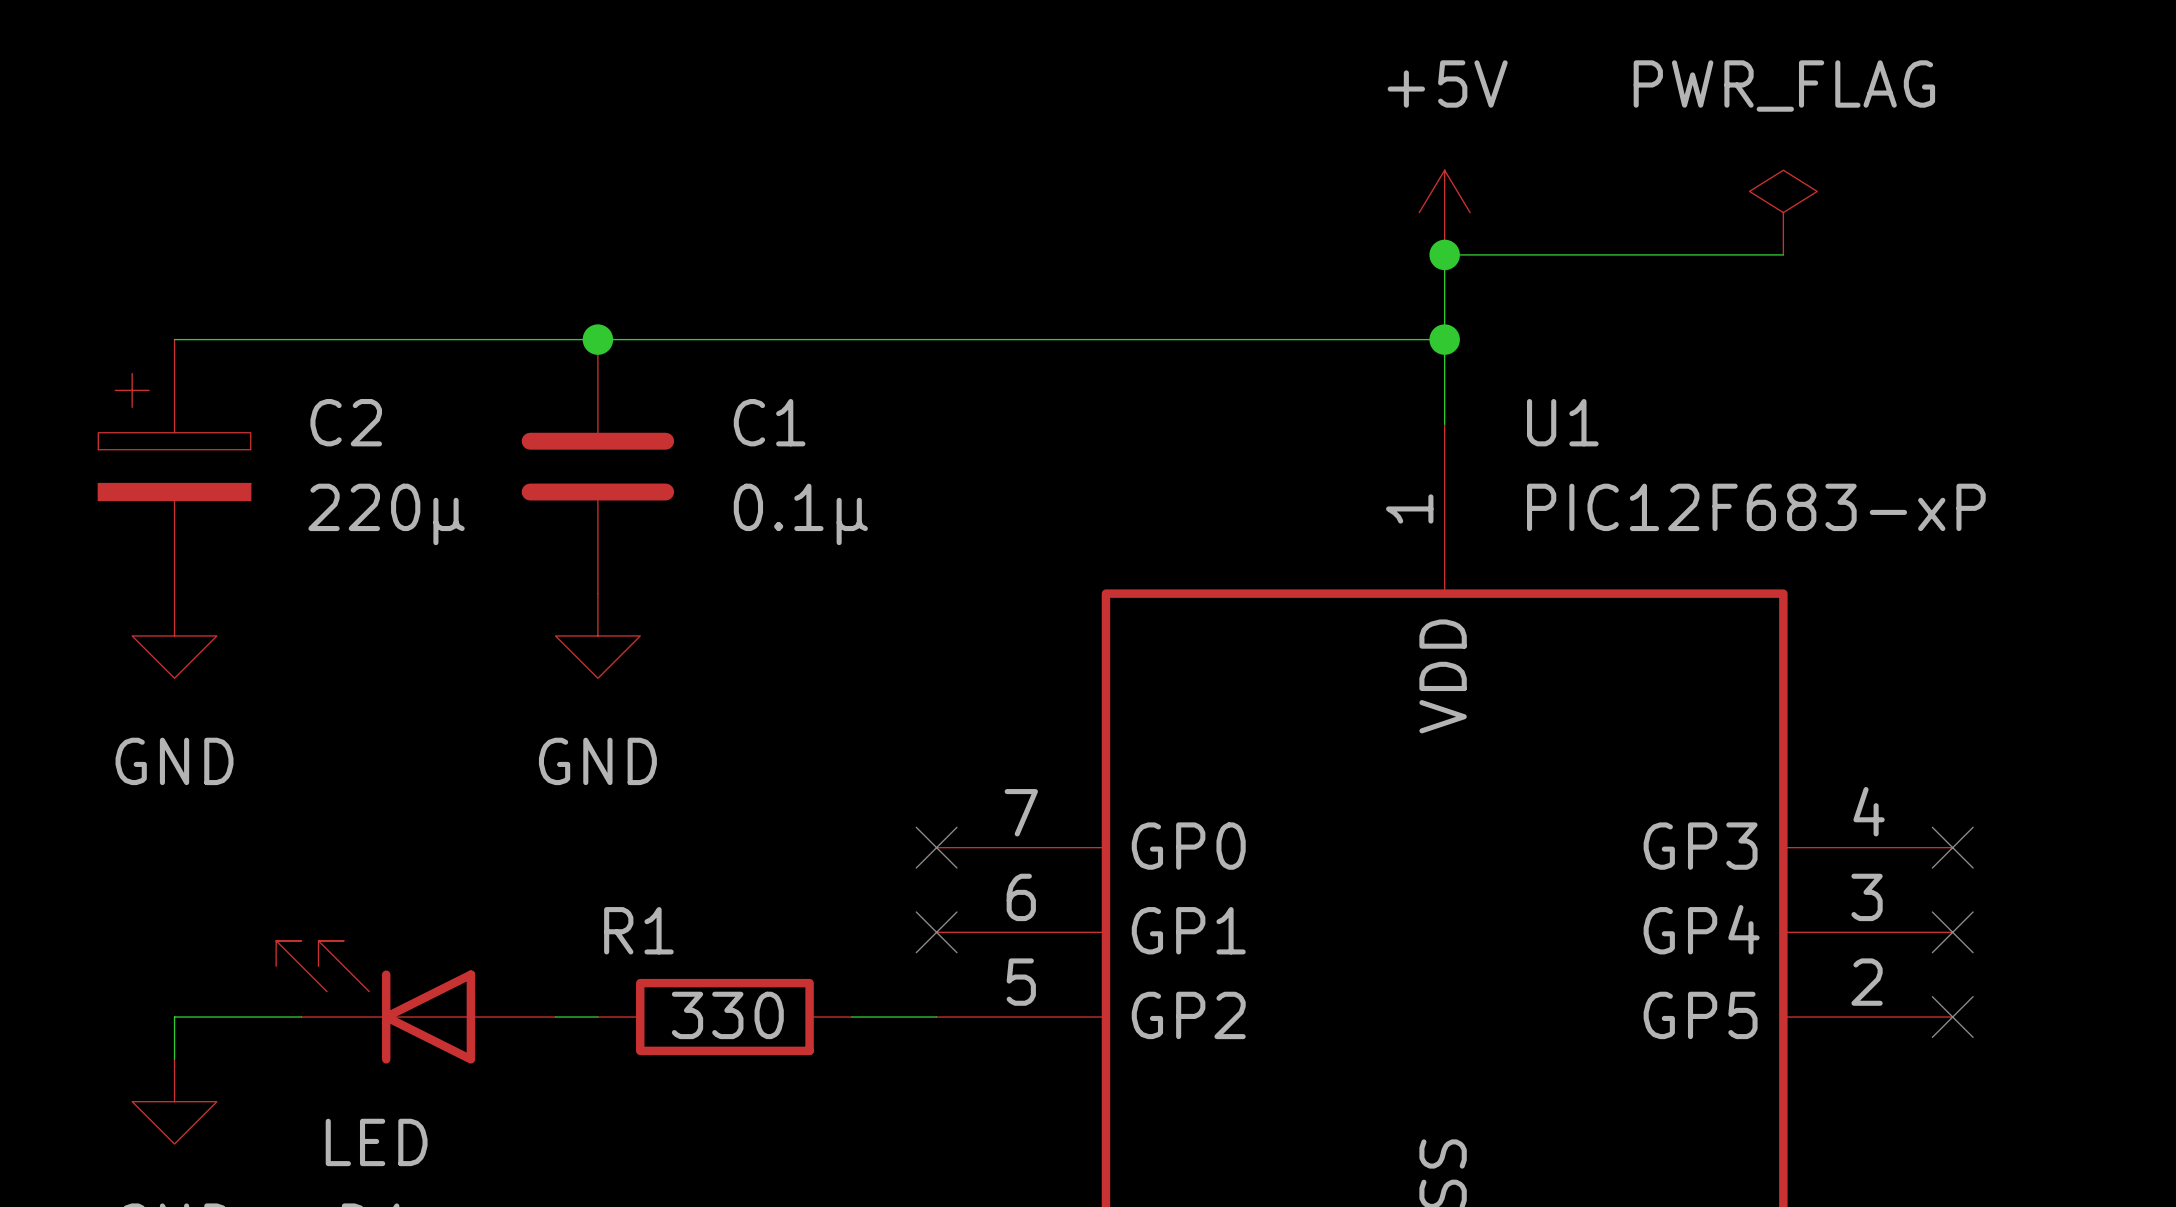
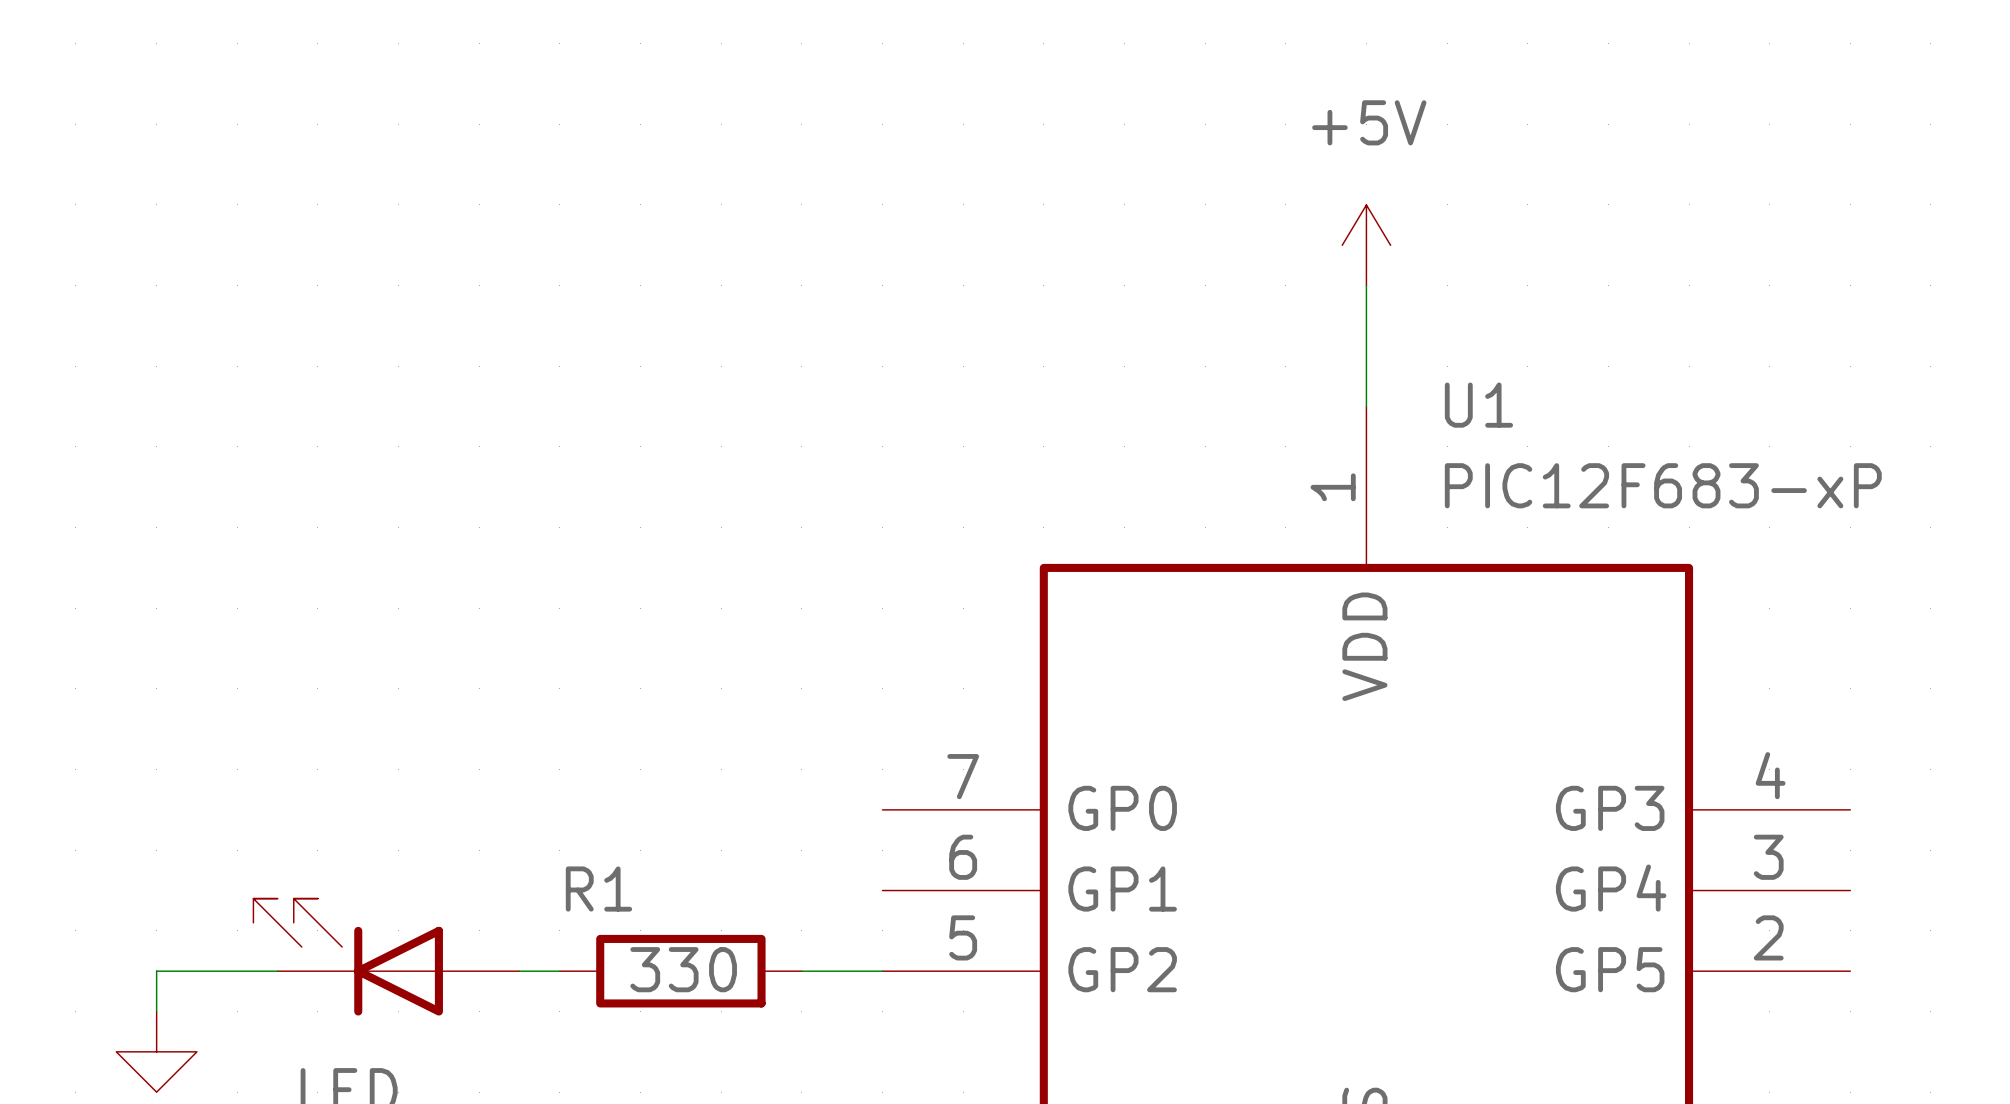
power symbol position: +5V (1444, 212) -> +5V (1366, 245)
power symbol: PWR_FLAG (1783, 212) -> none
junction: (1444, 254) -> none
wire: (1783, 254) (1444, 254) (1444, 297) -> none
wire: (174, 339) (1444, 339) -> none
junction: (597, 339) -> none
junction: (1444, 339) -> none
C2: 220μ (174, 466) -> none
C1: 0.1μ (597, 466) -> none
power symbol: GND (174, 635) -> none
power symbol: GND (597, 635) -> none
no-connect mark: (936, 847) -> none
no-connect mark: (1952, 847) -> none
no-connect mark: (936, 932) -> none
no-connect mark: (1952, 932) -> none
no-connect mark: (1952, 1017) -> none

